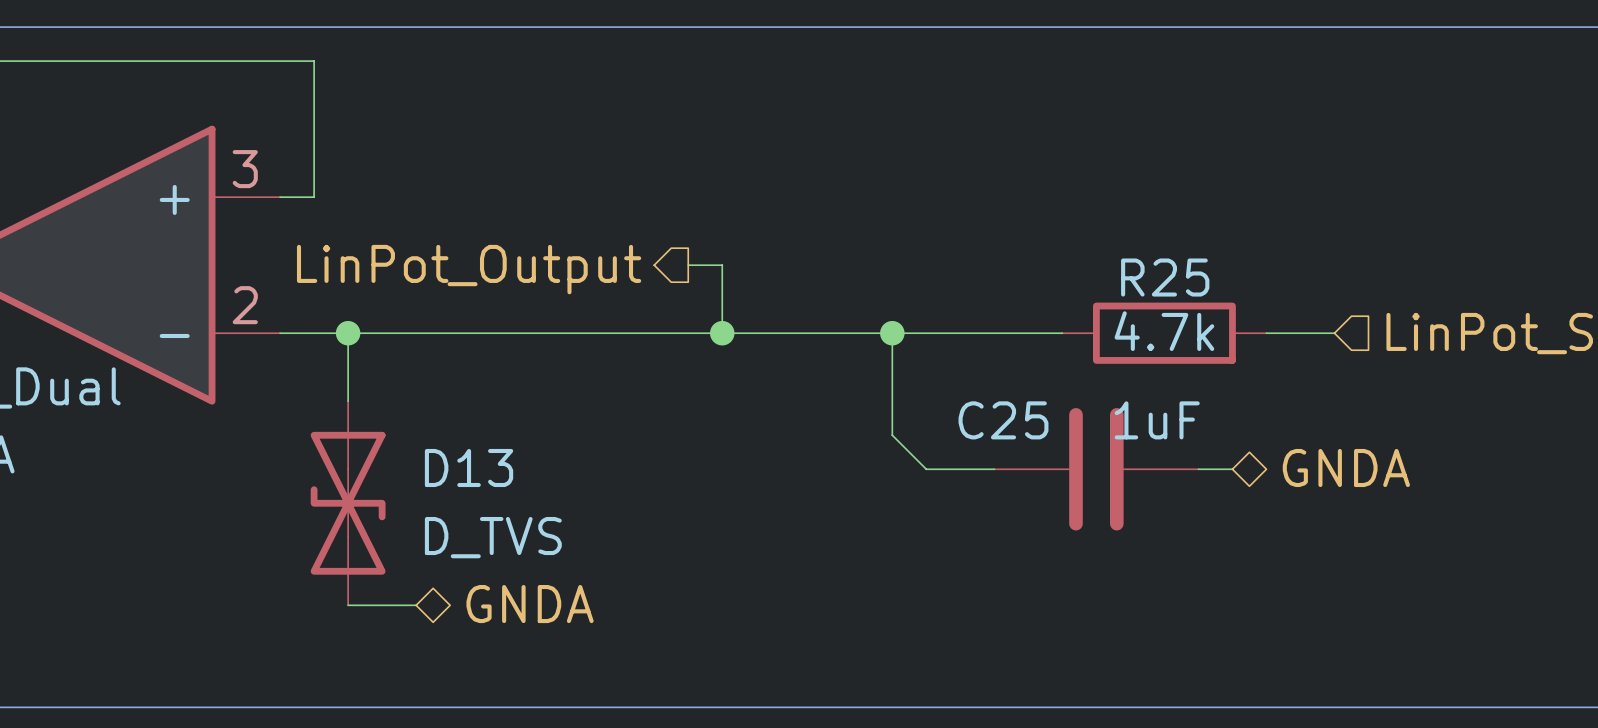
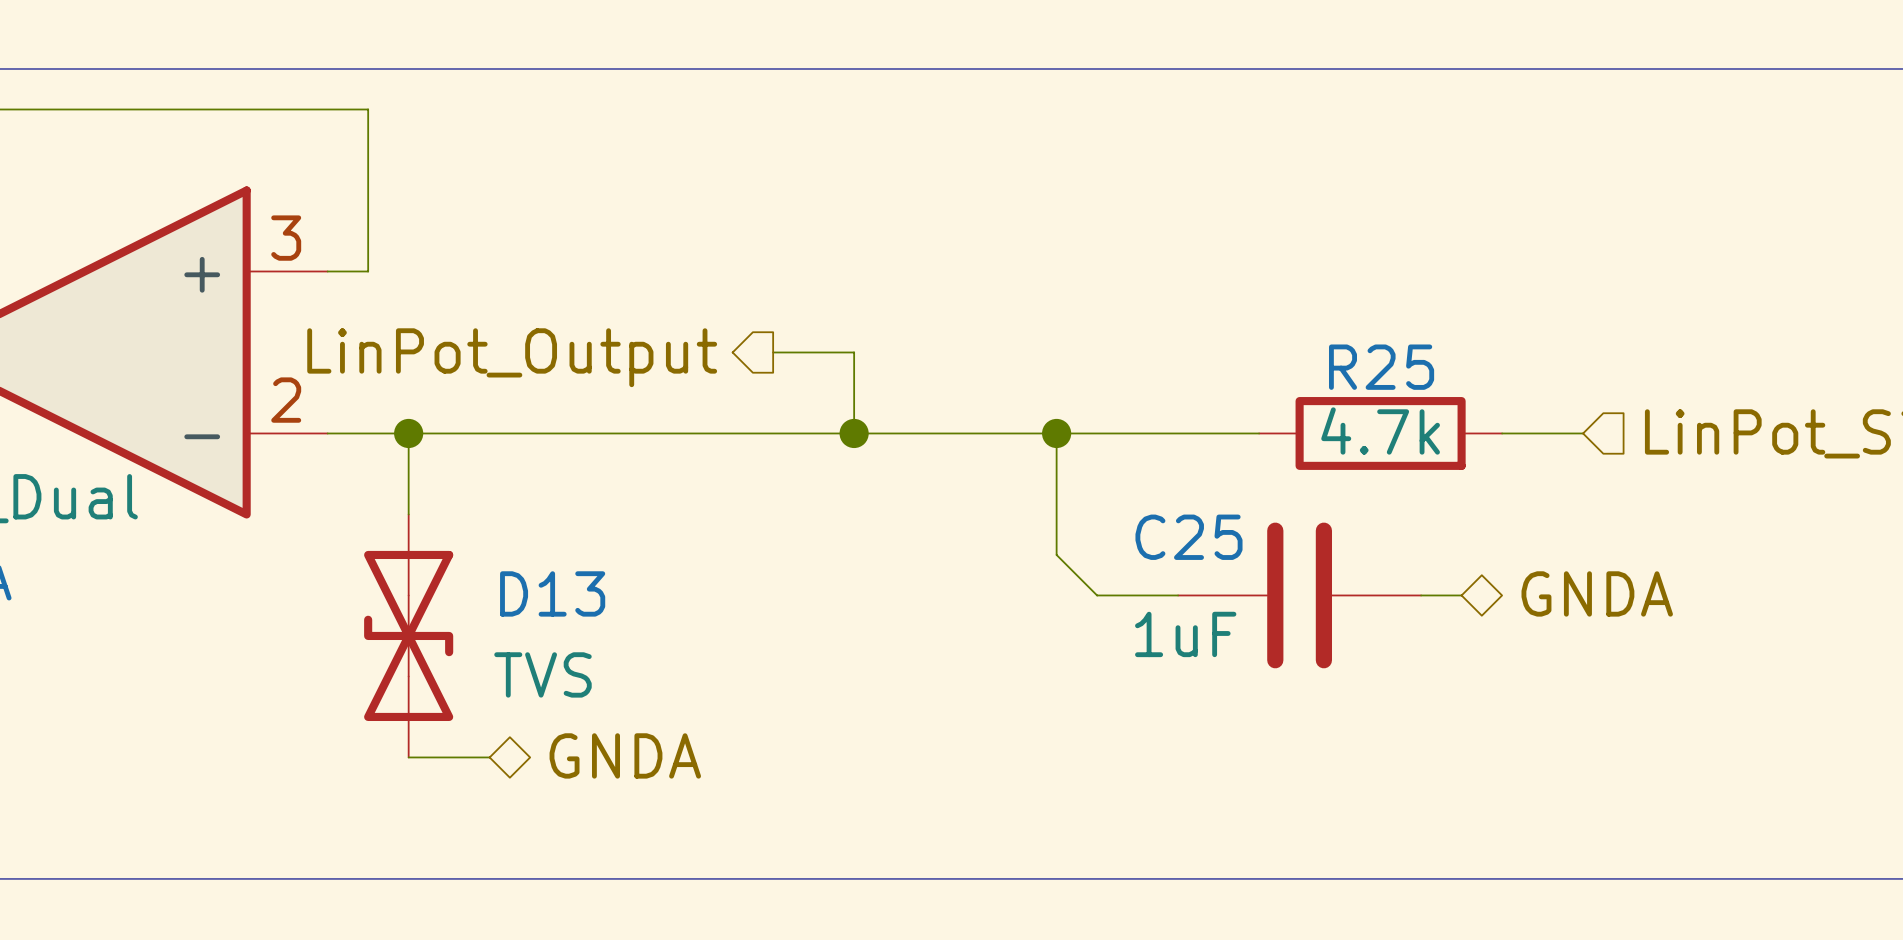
wire: none -> (773, 352) (813, 352)
hierarchical label position: LinPot_Output (469, 269) -> LinPot_Output (512, 357)
C25 value position: 1uF (1157, 420) -> 1uF (1185, 634)
D13 value: D_TVS (493, 537) -> TVS (542, 674)

